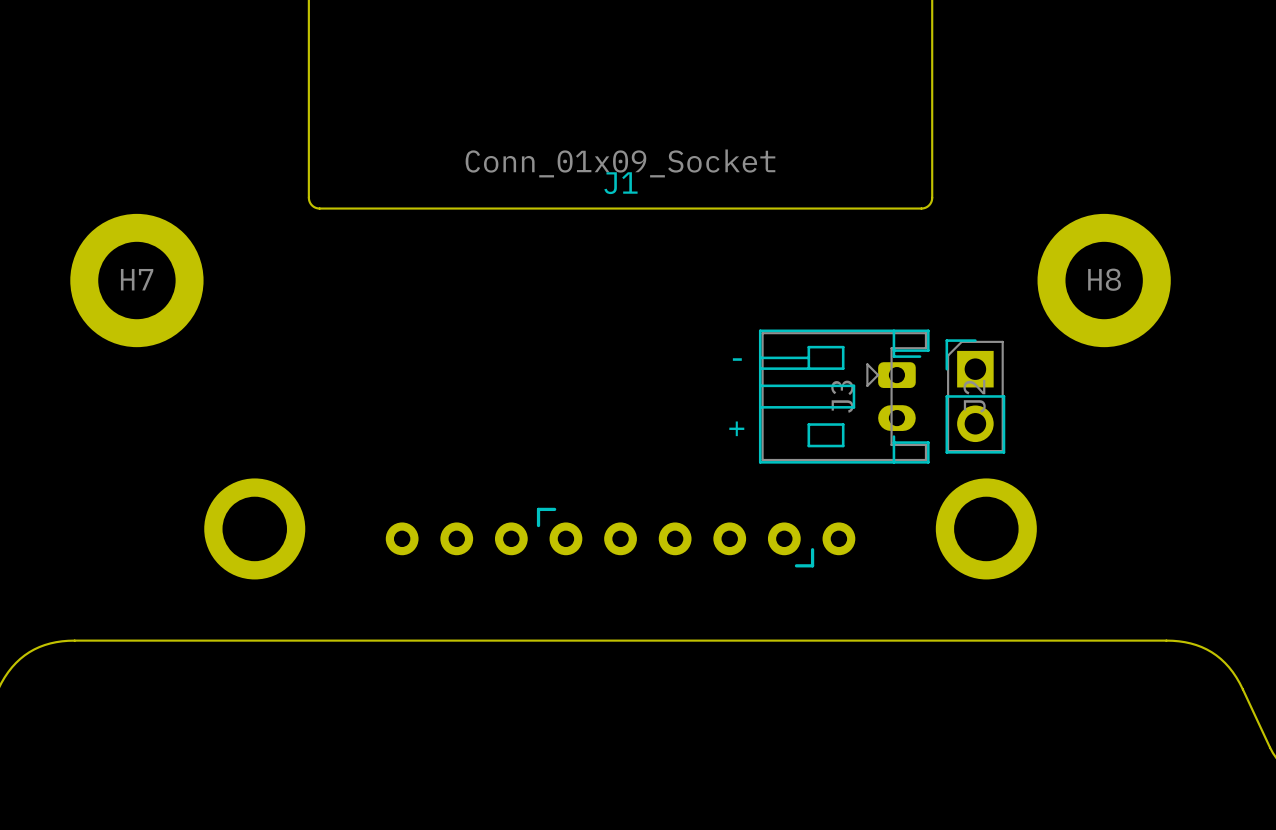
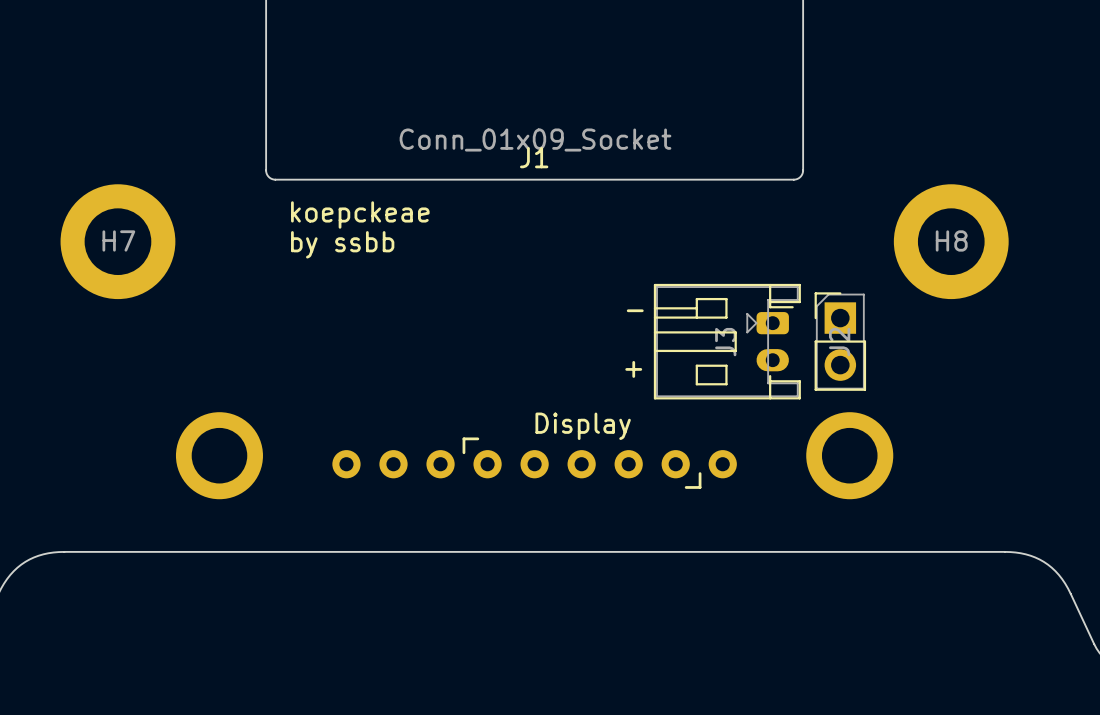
text: none -> koepckeae (360, 214)
text: none -> by ssbb (342, 244)
text: none -> Display (583, 426)

